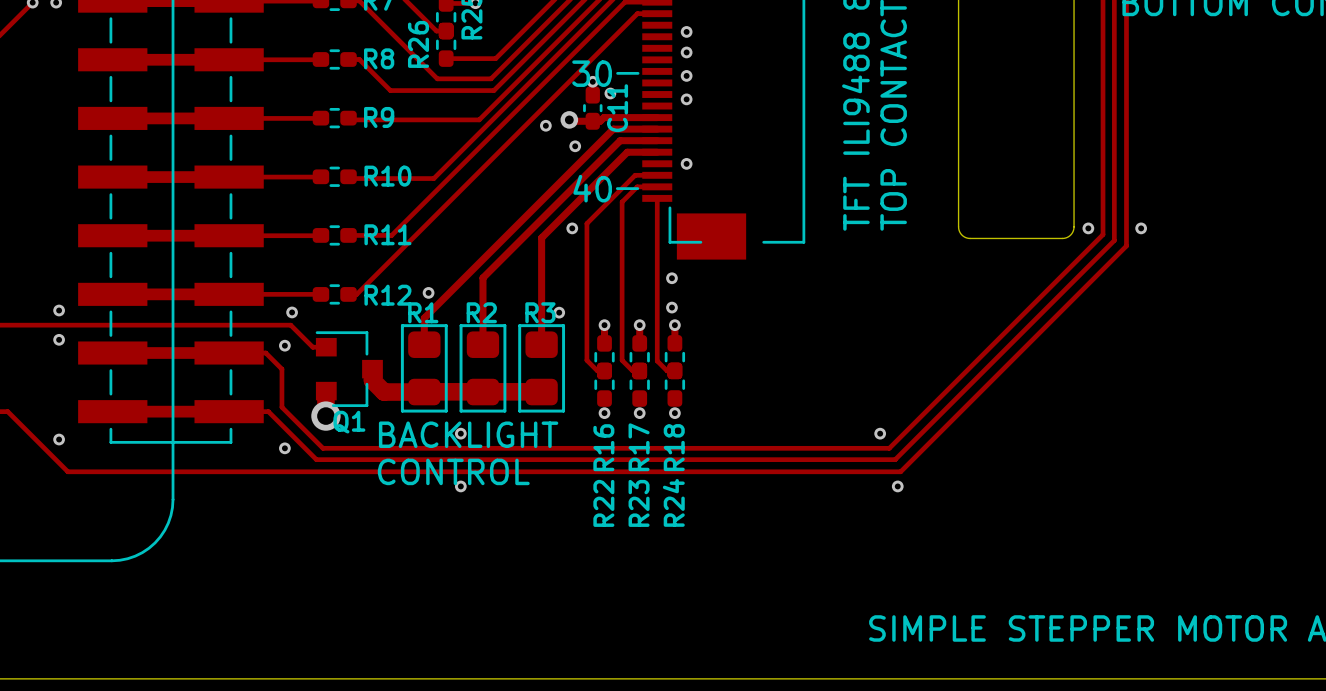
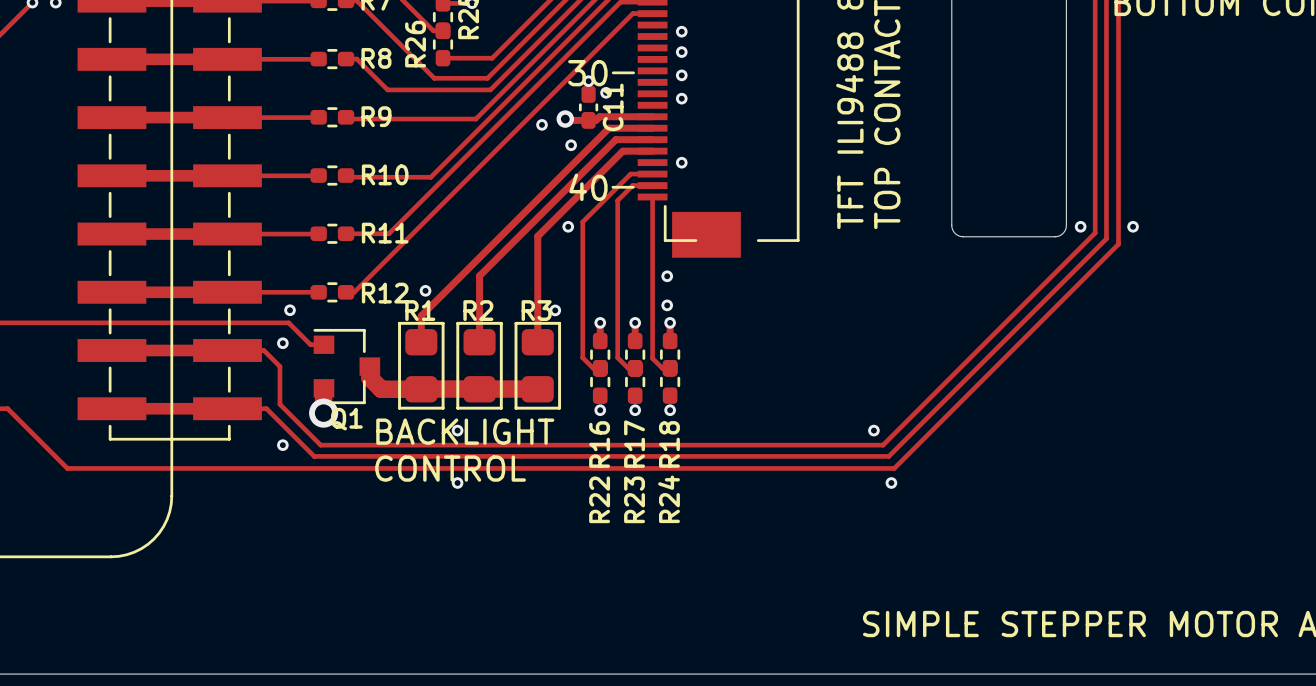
via: (59, 310) -> none
via: (59, 339) -> none
via: (59, 439) -> none

